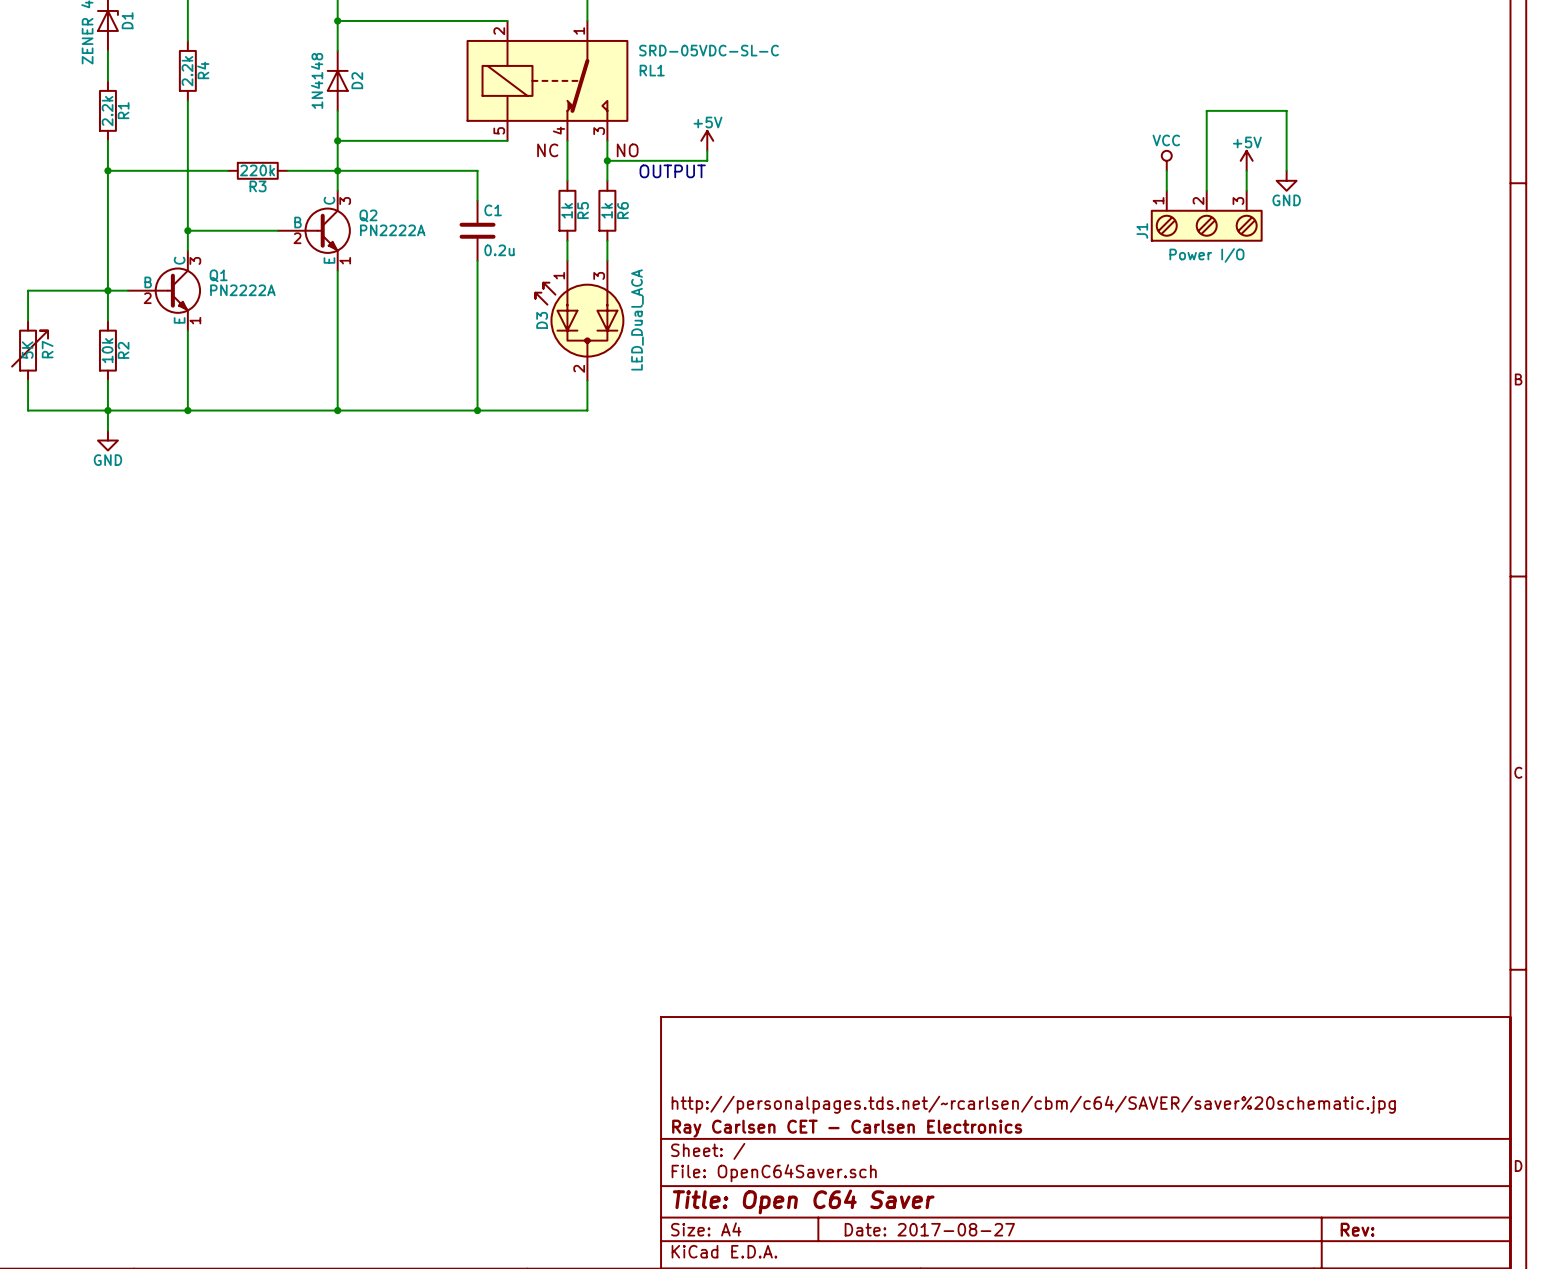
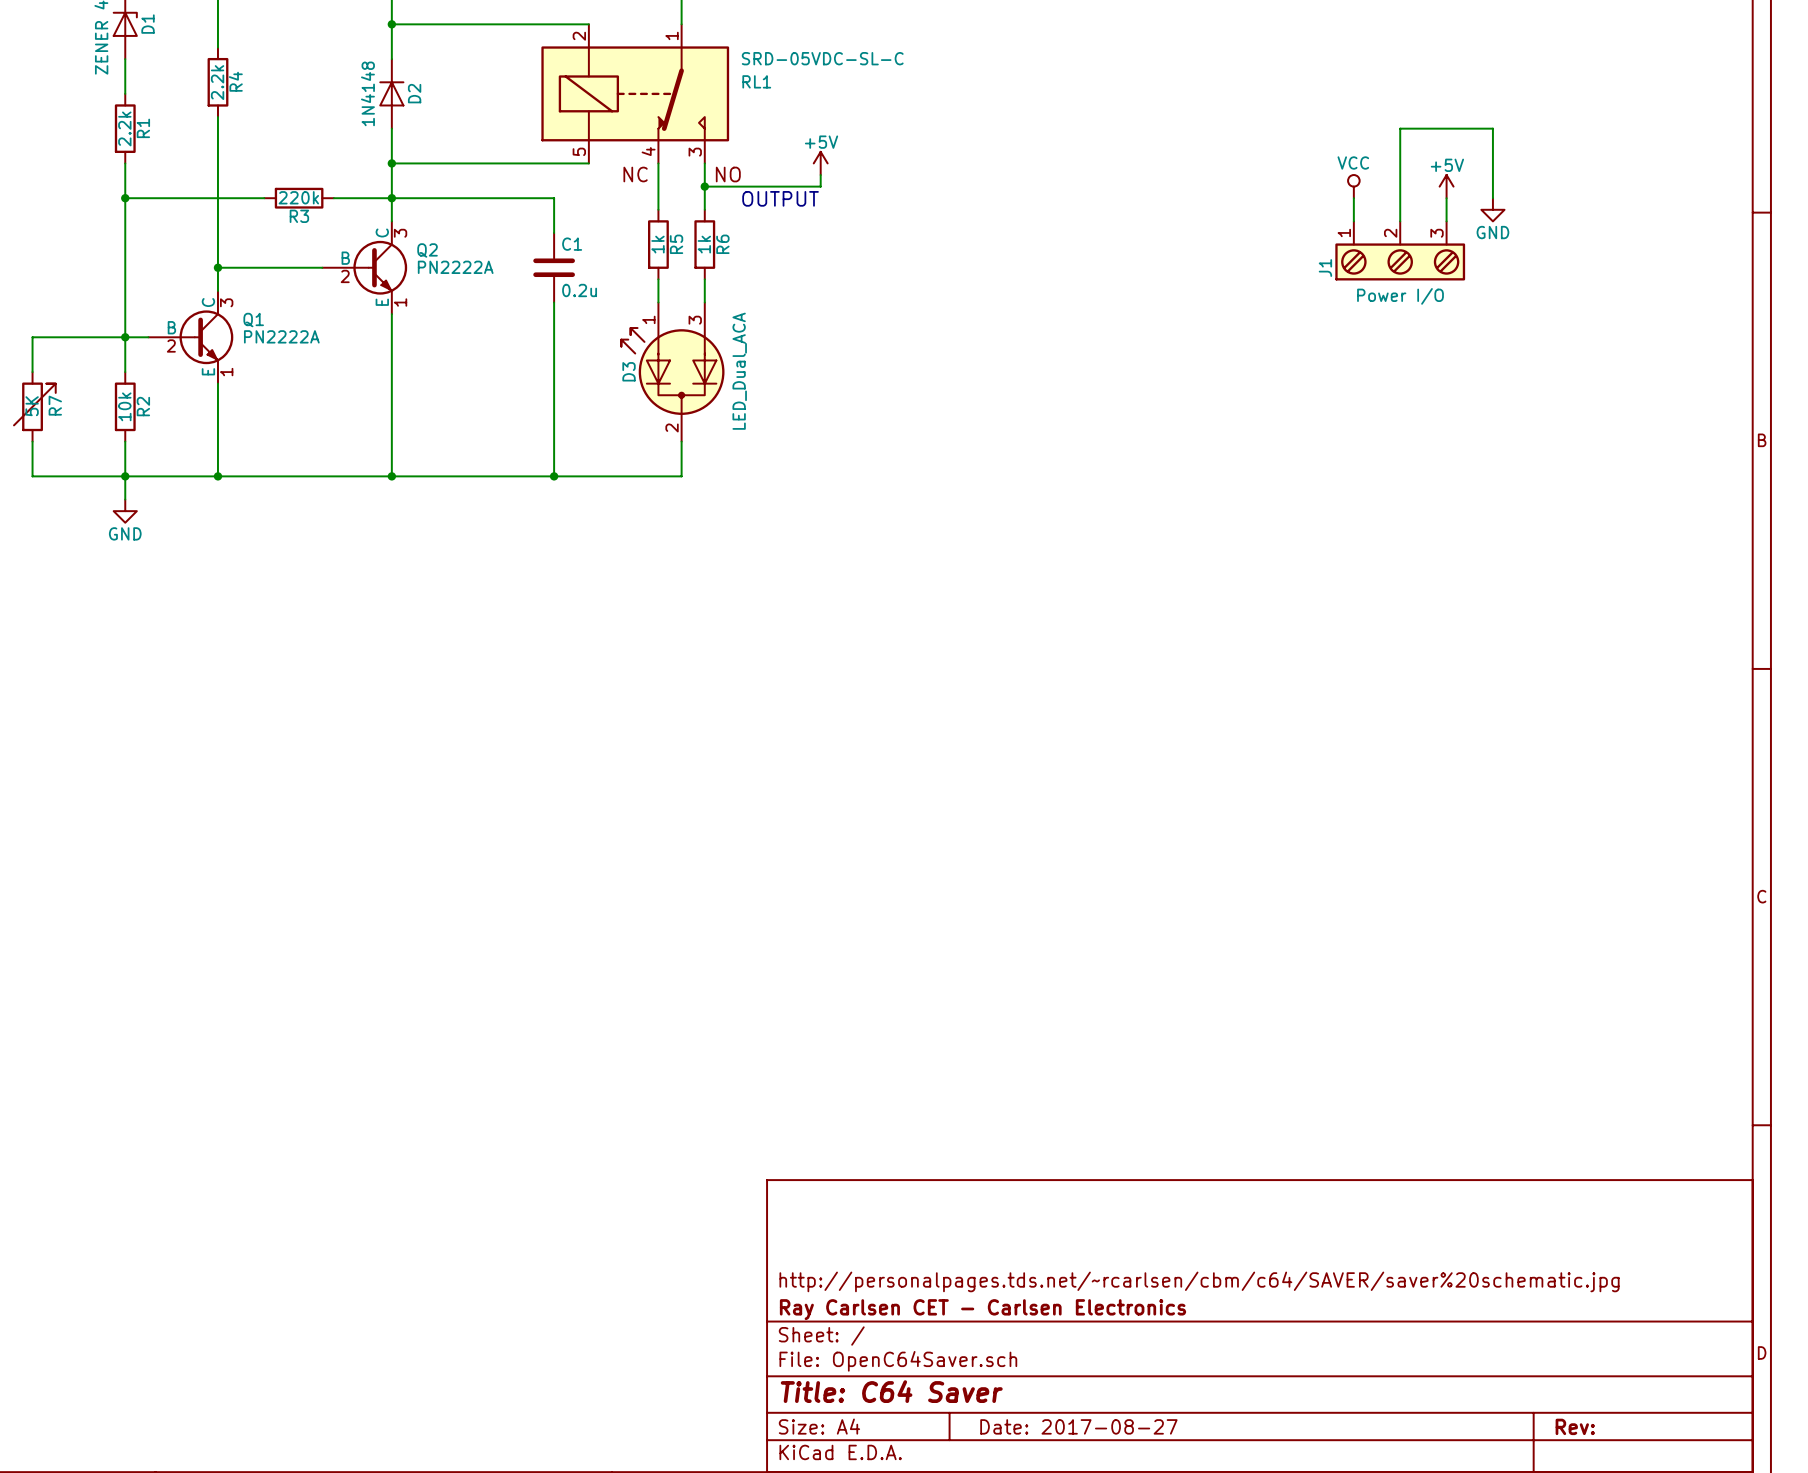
title block: Title: Open C64 Saver (803, 1201) -> Title: C64 Saver (891, 1391)

